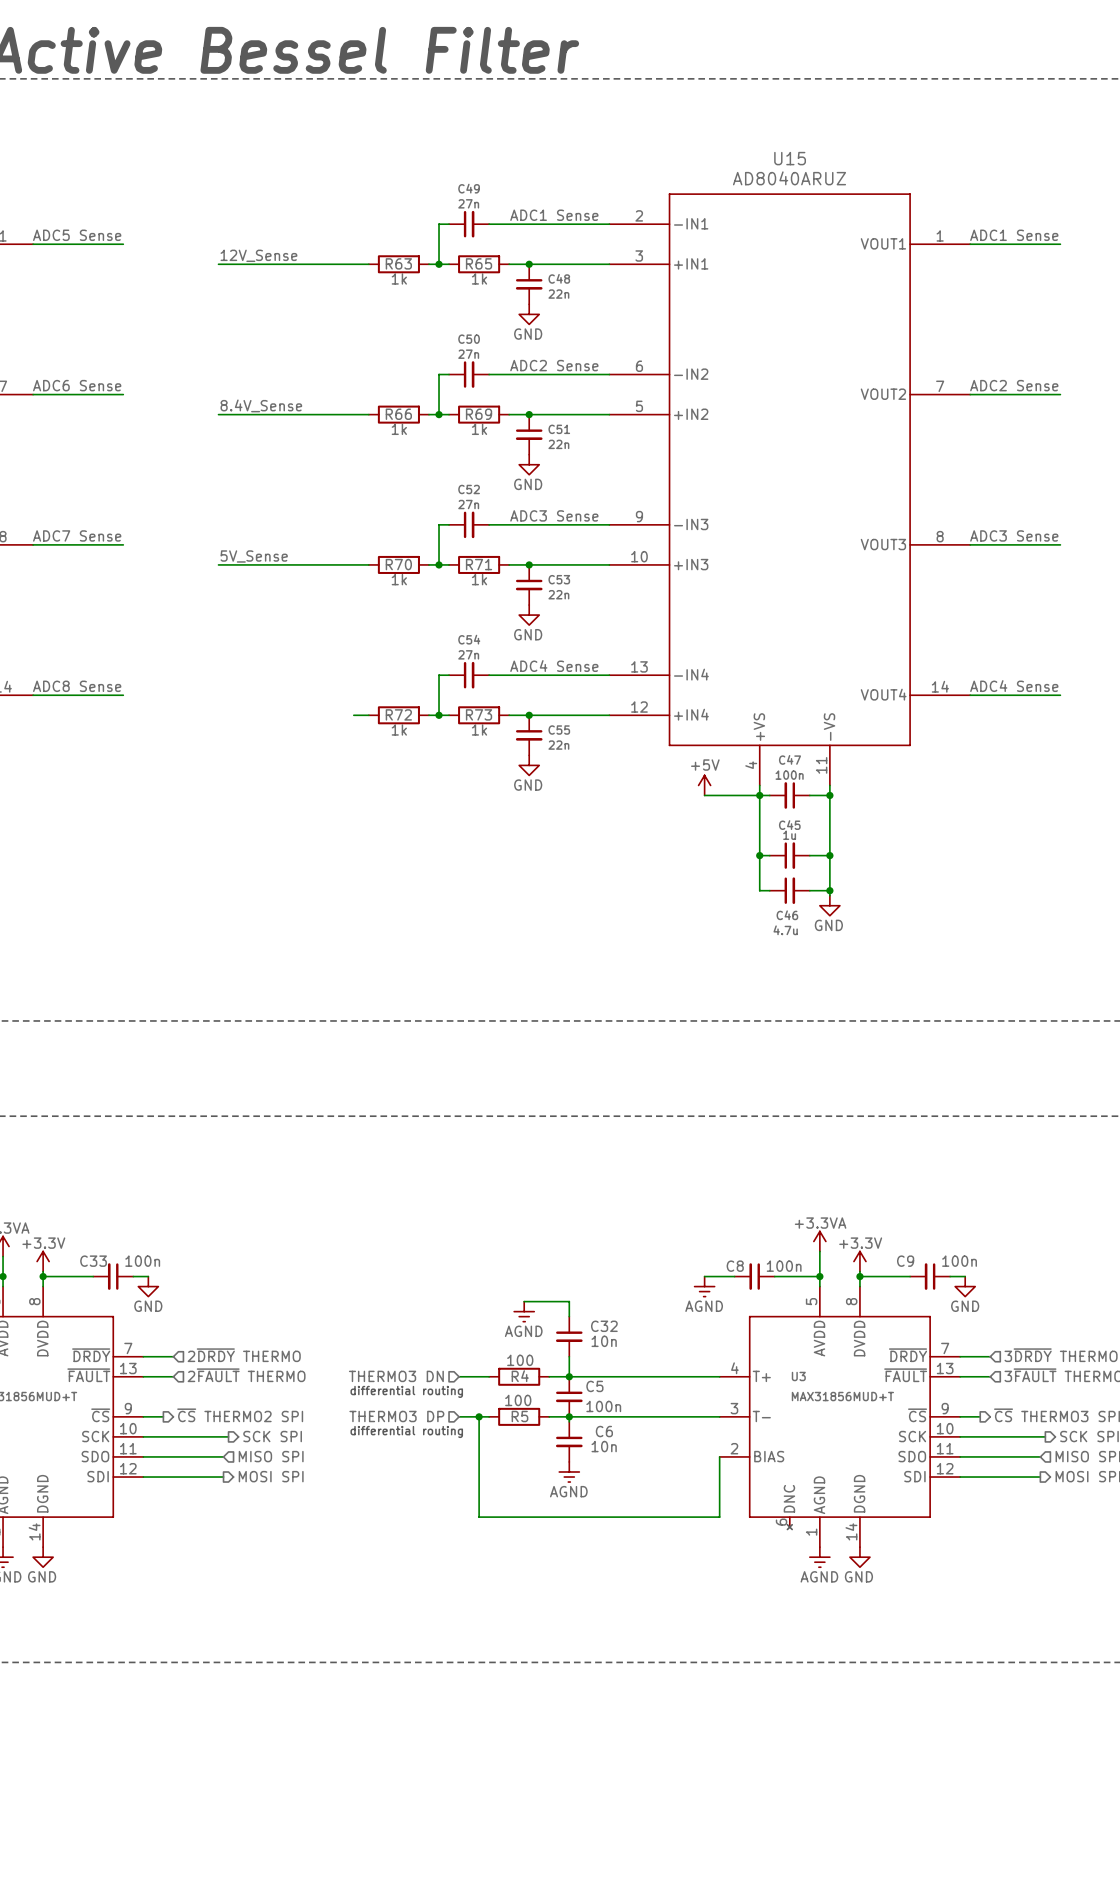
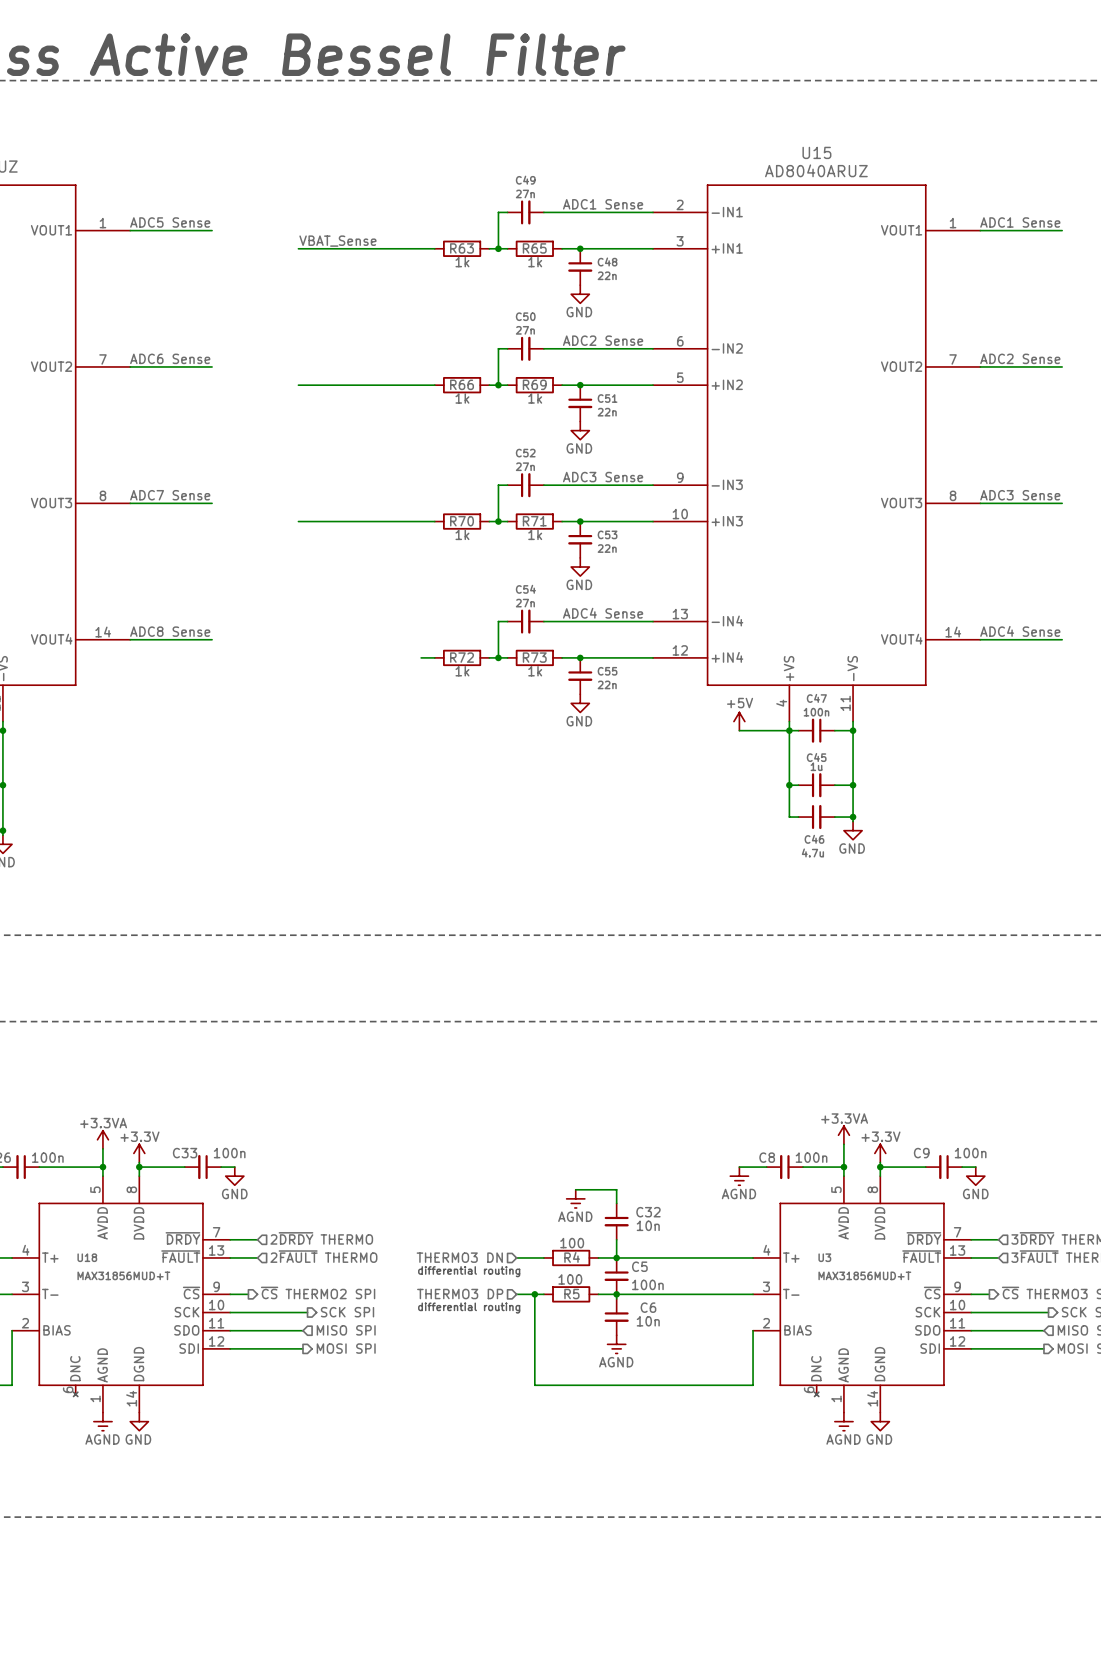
label: 12V_Sense (258, 255) -> VBAT_Sense (337, 241)
label: 8.4V_Sense (261, 405) -> none
label: 5V_Sense (254, 556) -> none

